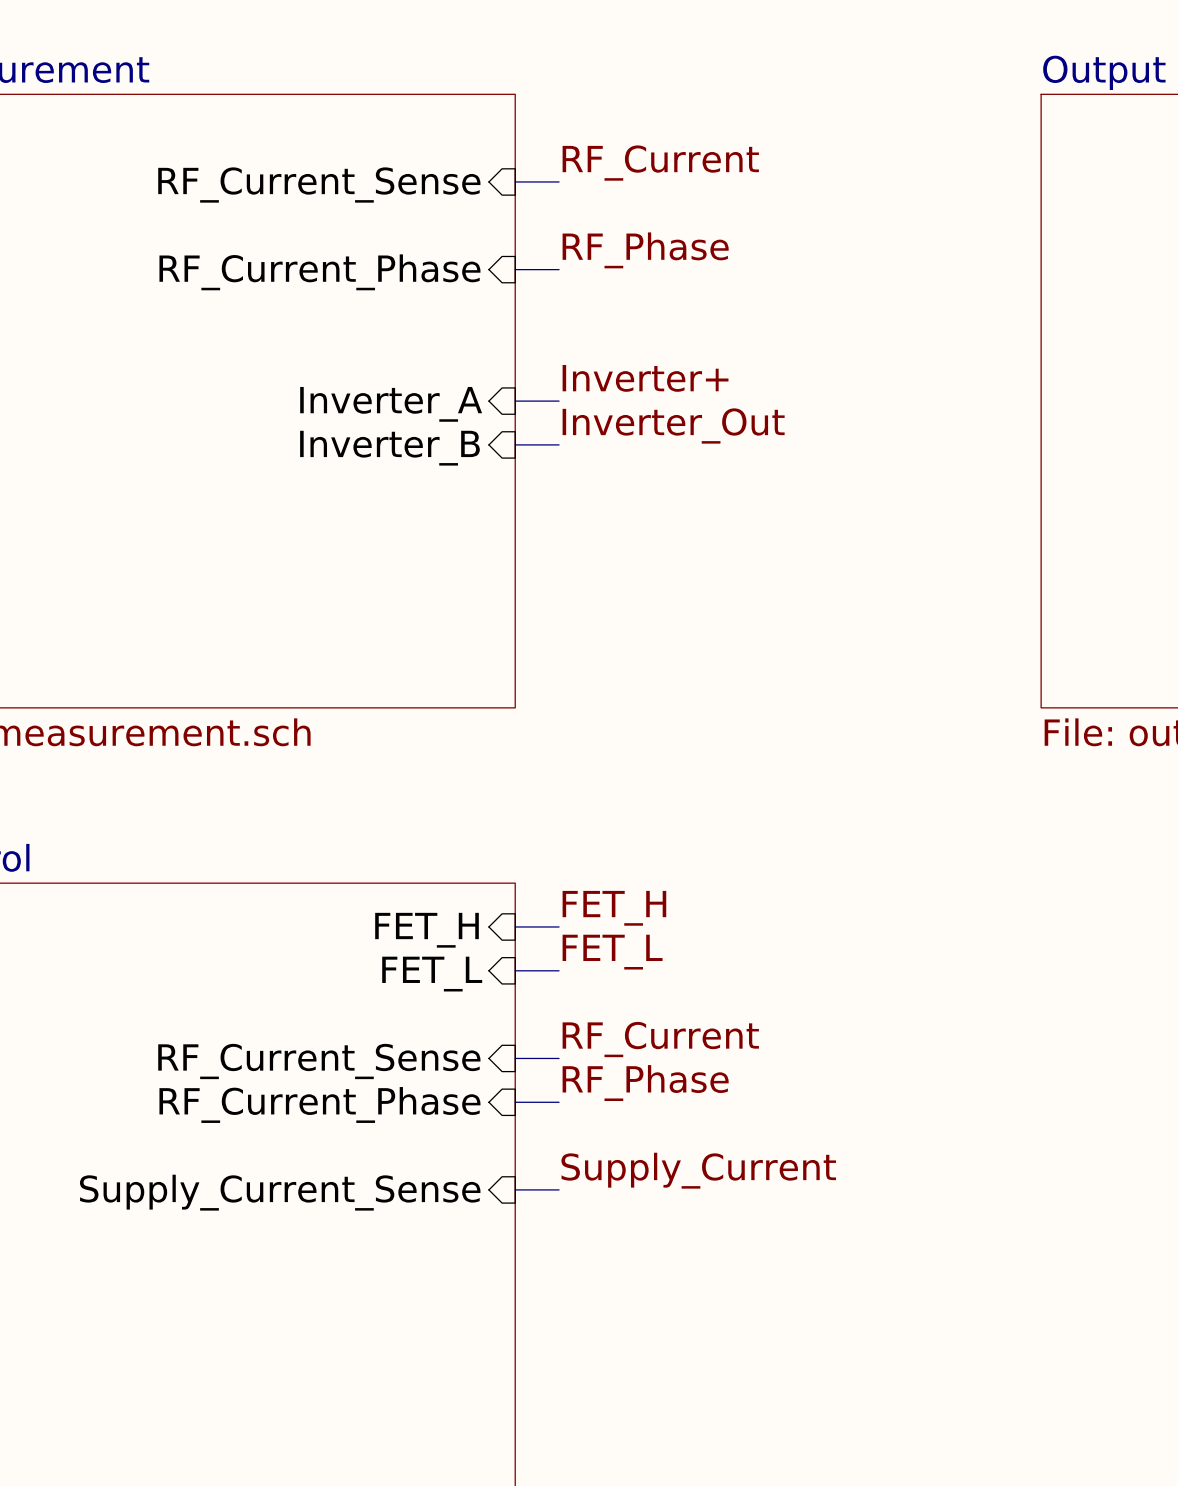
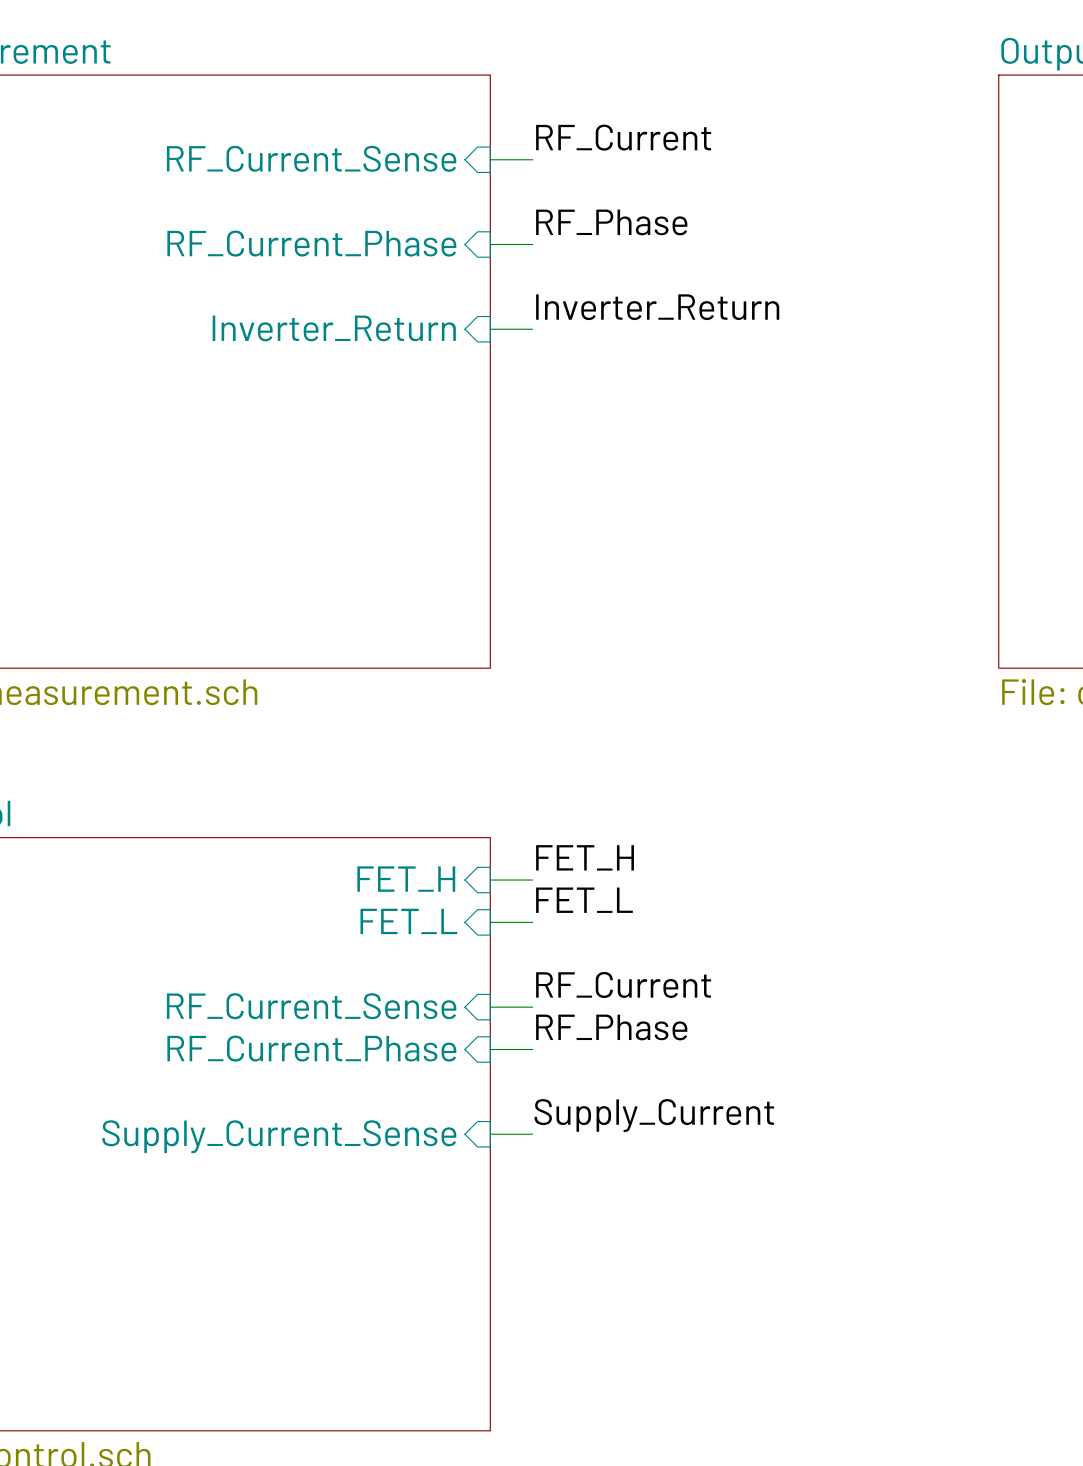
label: Inverter+ (645, 378) -> Inverter_Return (657, 307)
wire: (515, 401) (559, 401) -> (490, 329) (532, 329)
sheet pin: Inverter_A (391, 404) -> Inverter_Return (334, 328)
label: Inverter_Out (673, 425) -> none
wire: (515, 444) (559, 444) -> none
sheet pin: Inverter_B (389, 448) -> none

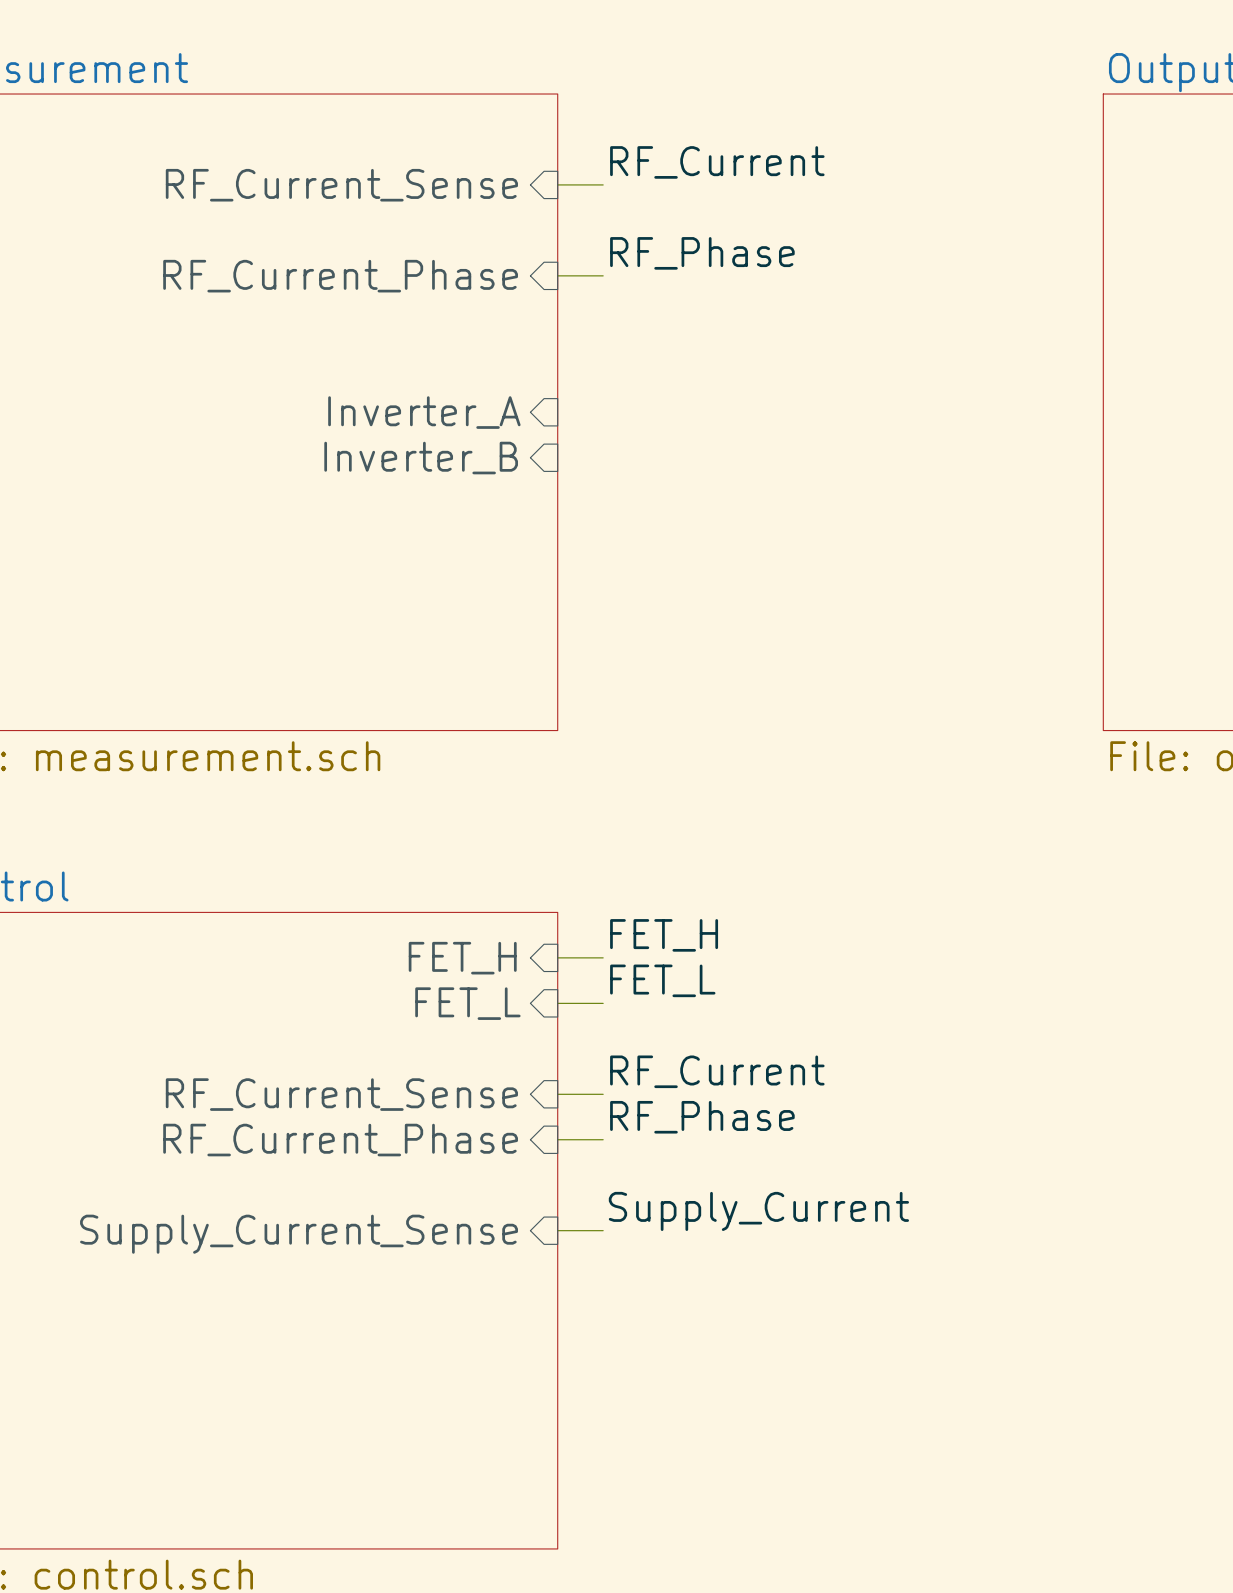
label: Inverter_Return (657, 307) -> none
sheet pin: Inverter_Return (334, 328) -> Inverter_A (424, 412)
wire: (490, 329) (532, 329) -> none
sheet pin: none -> Inverter_B (421, 458)

